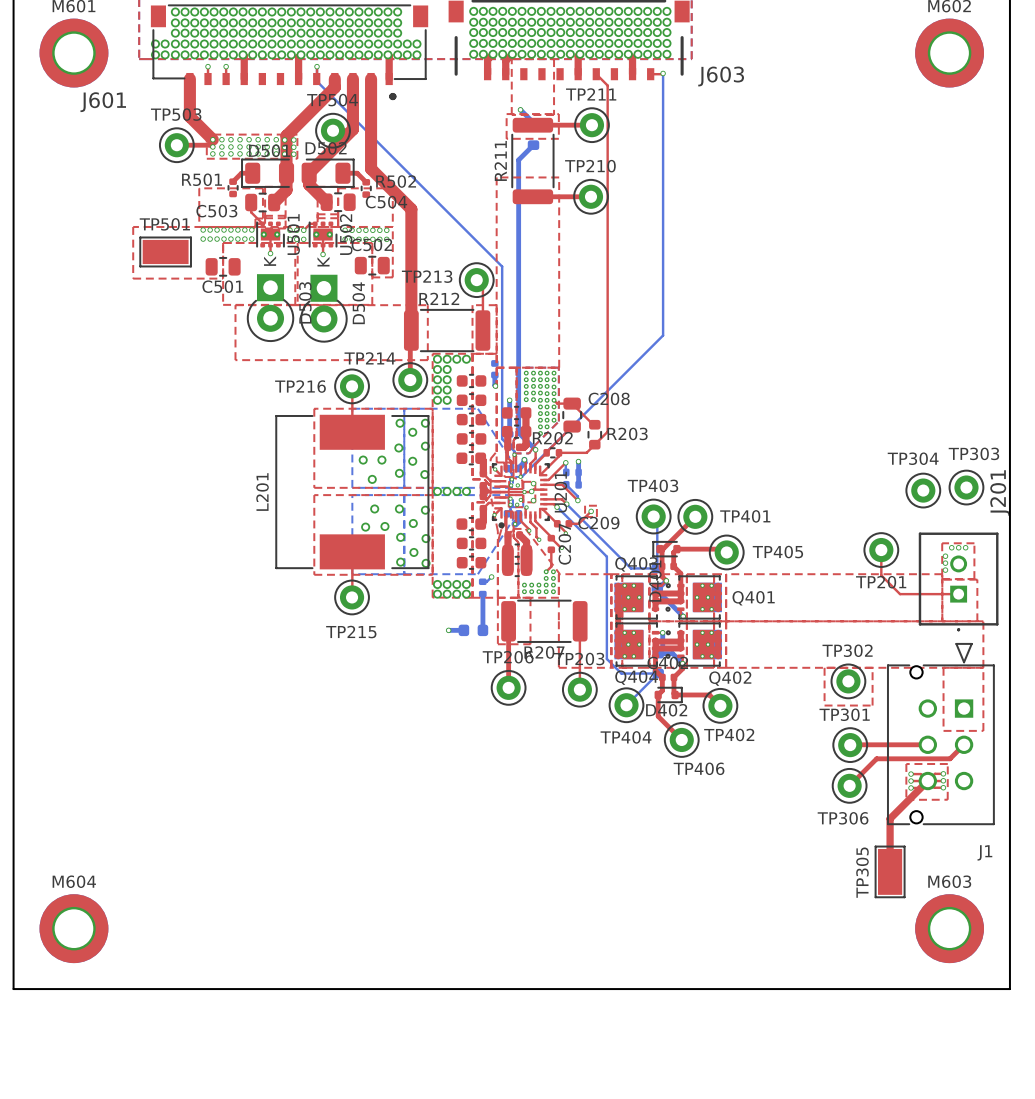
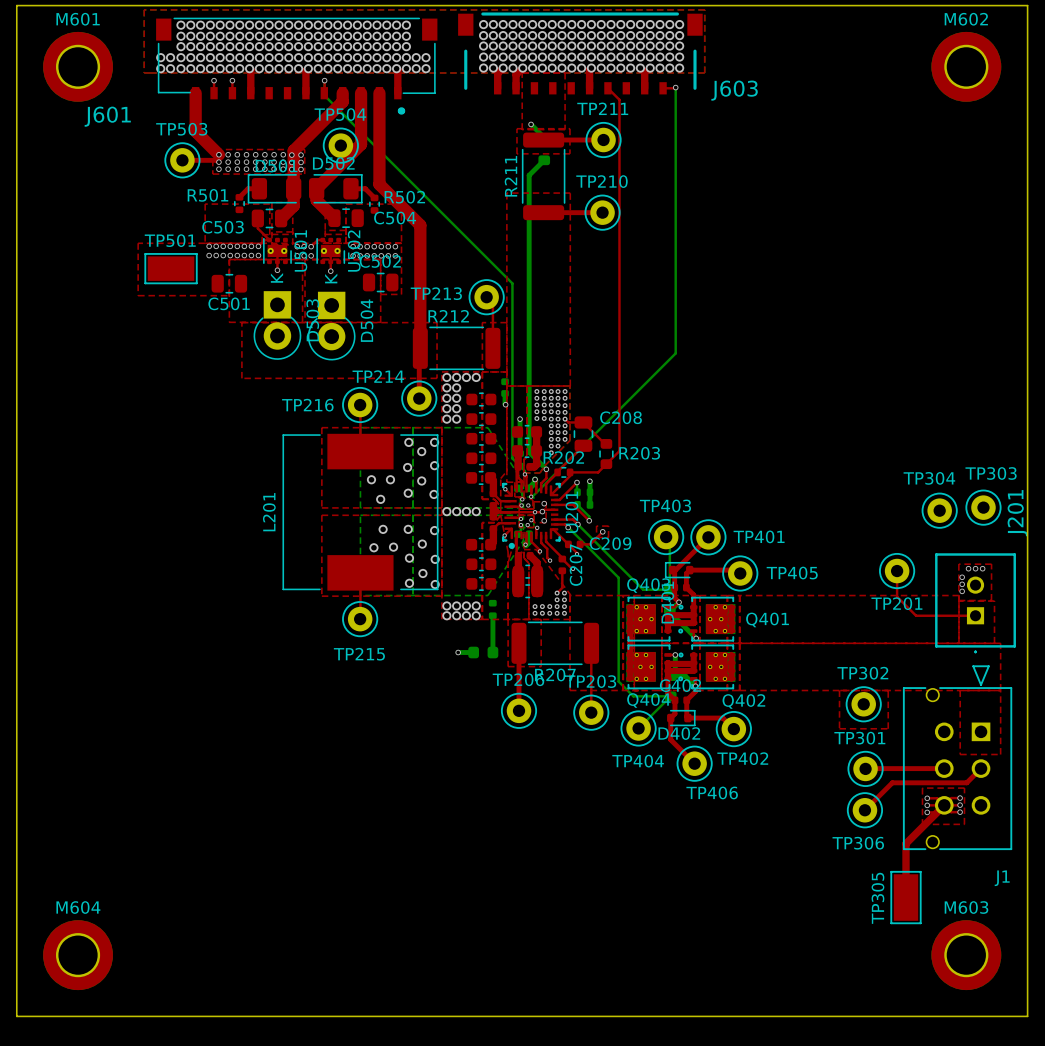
bottom track: (491, 576) (486, 581) (482, 581) -> none
via: (491, 576) -> none

